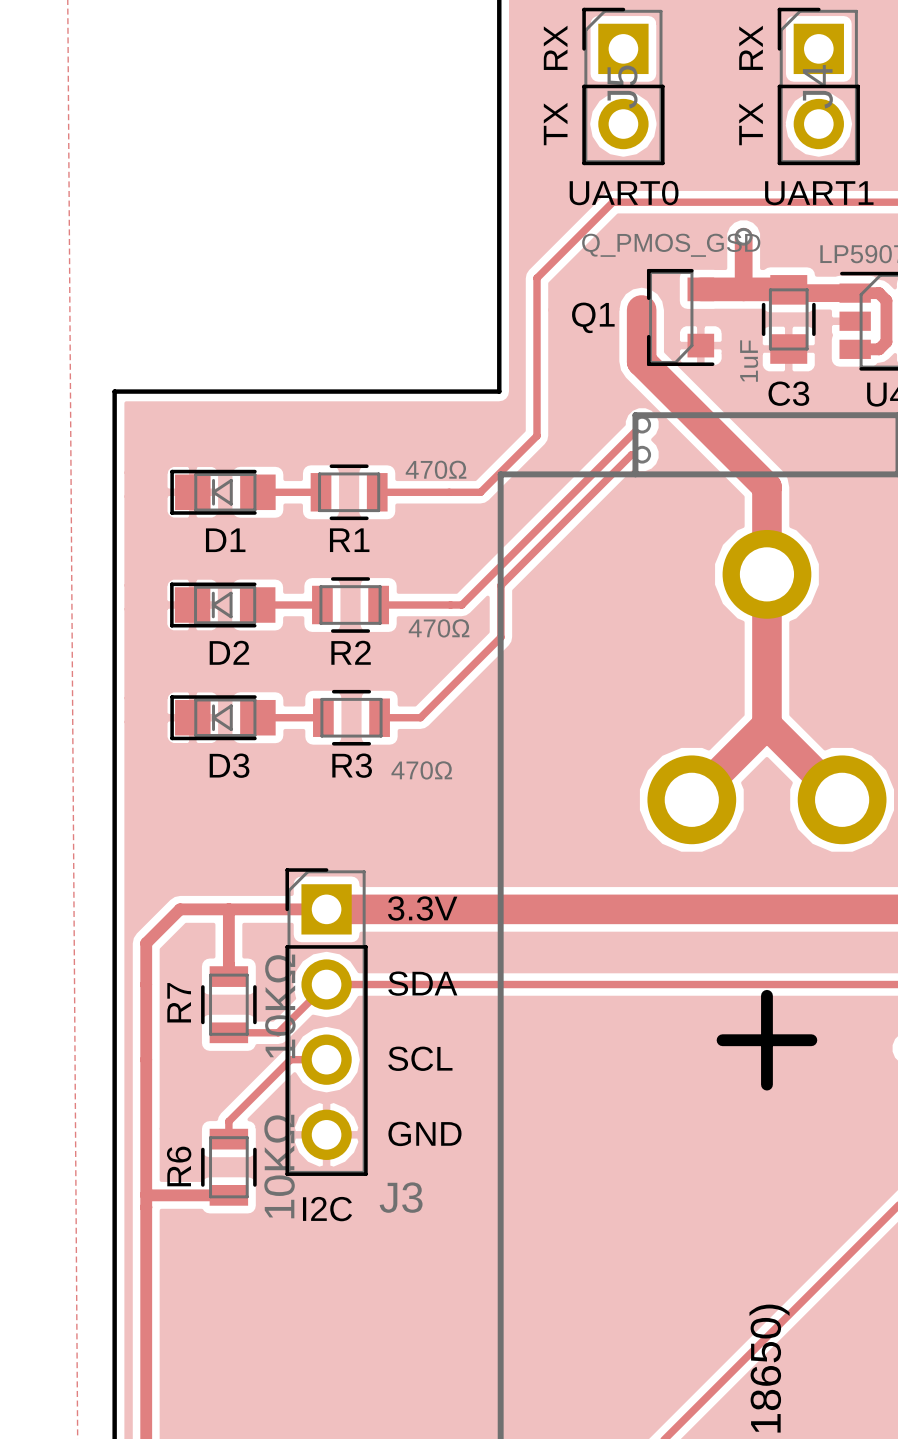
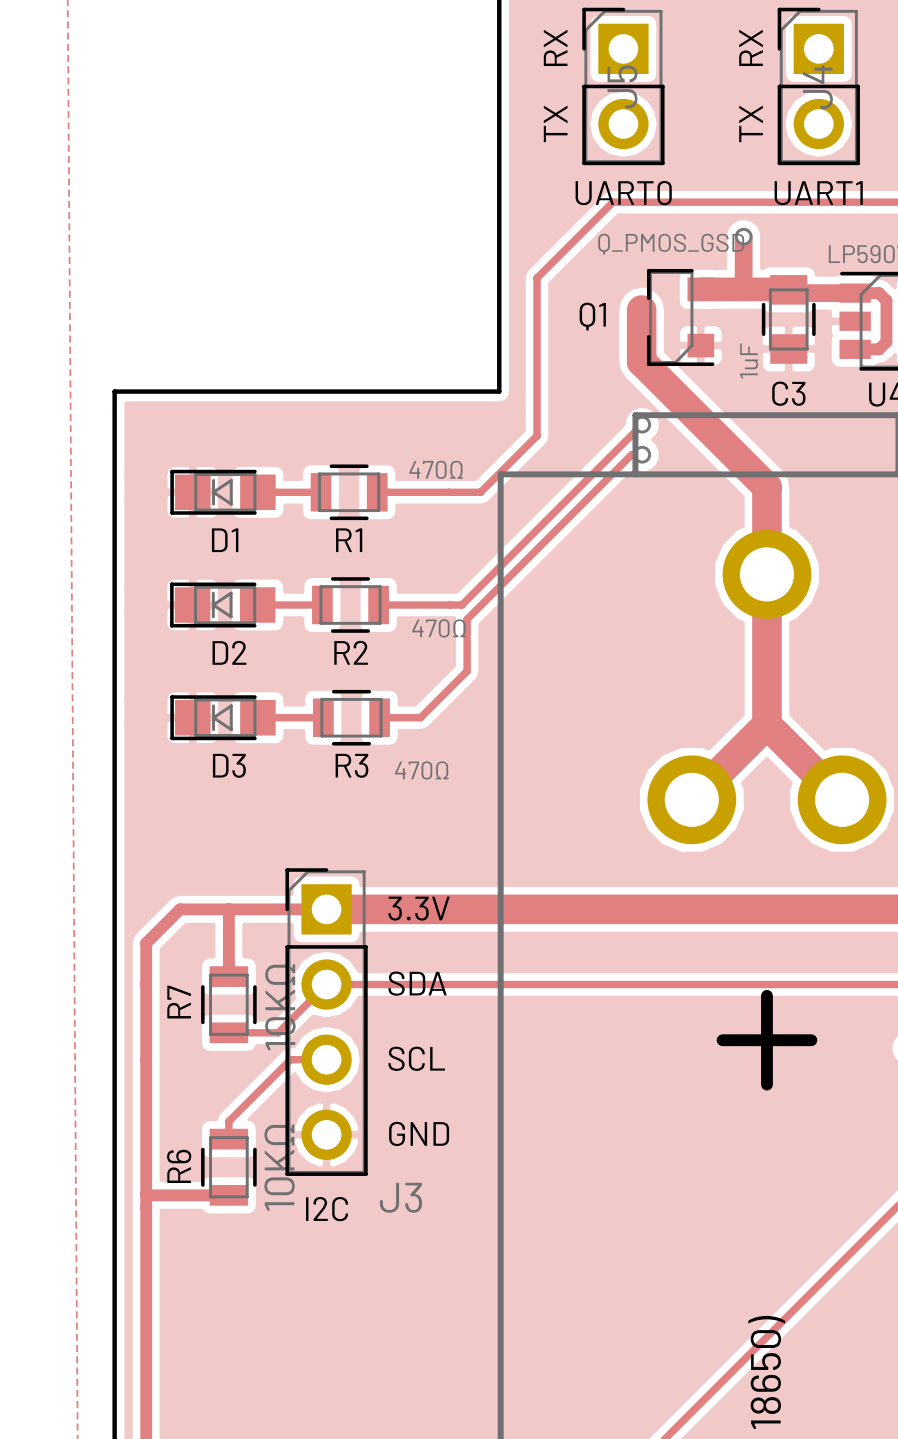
track: (500, 585) (500, 637) (467, 671) -> (500, 585) (467, 619) (467, 671)

